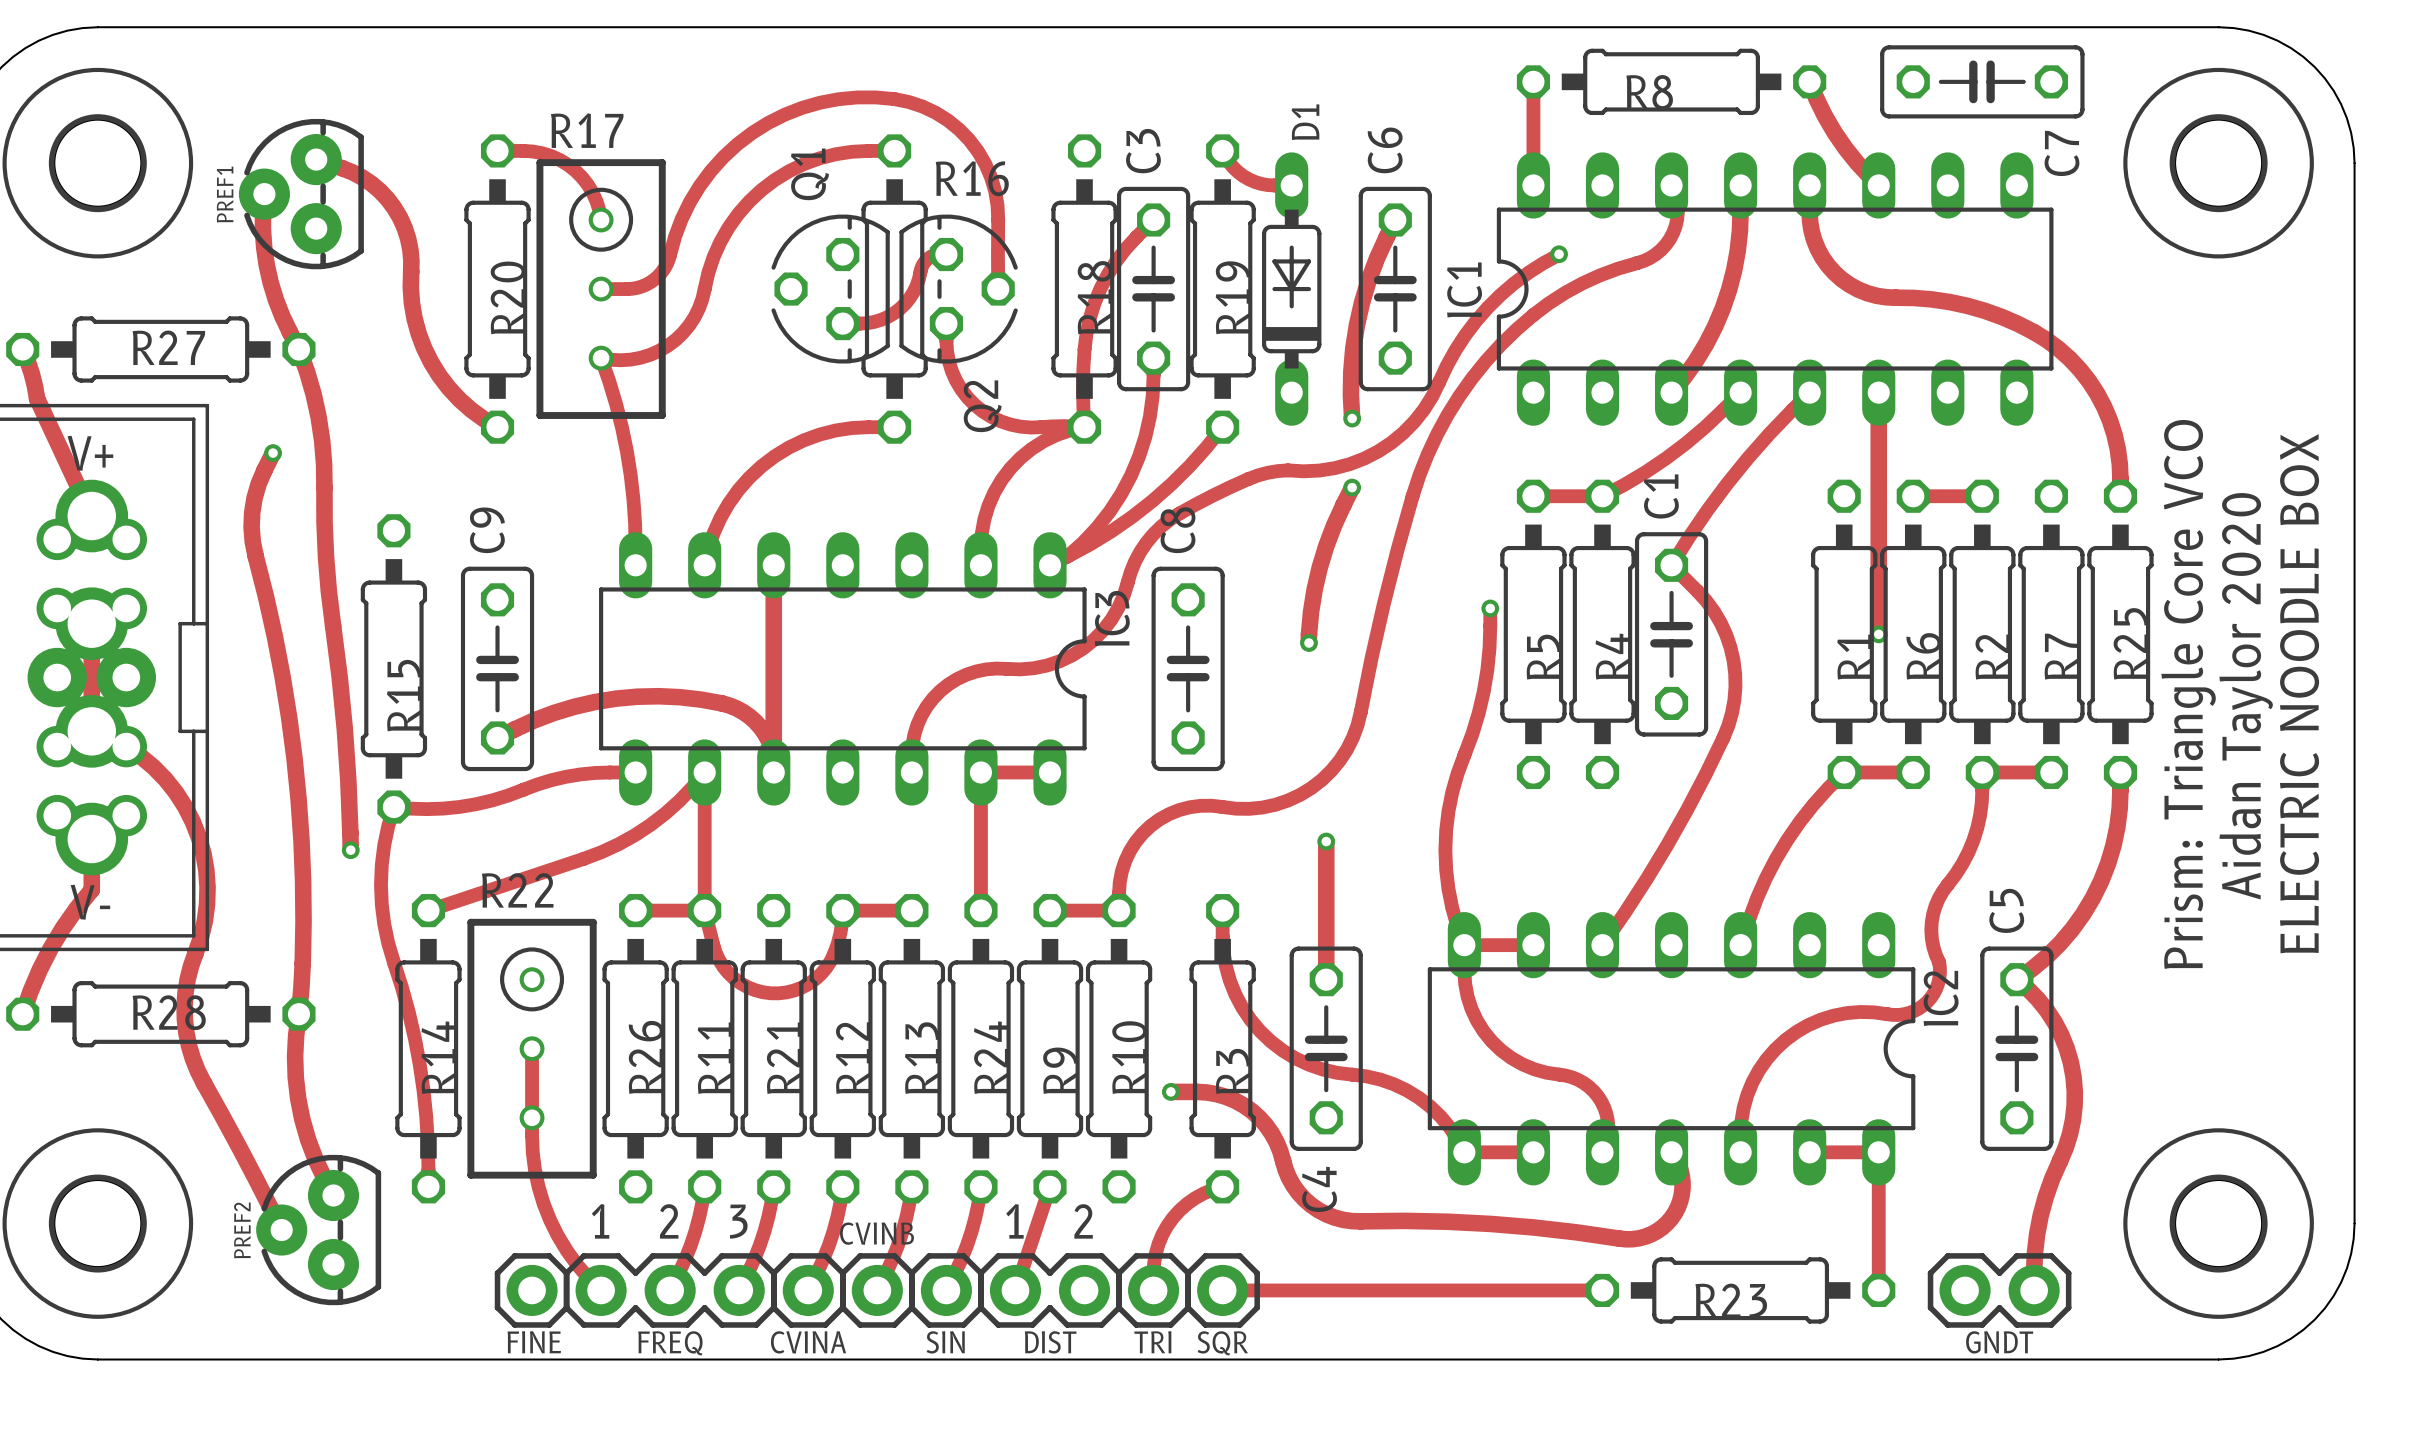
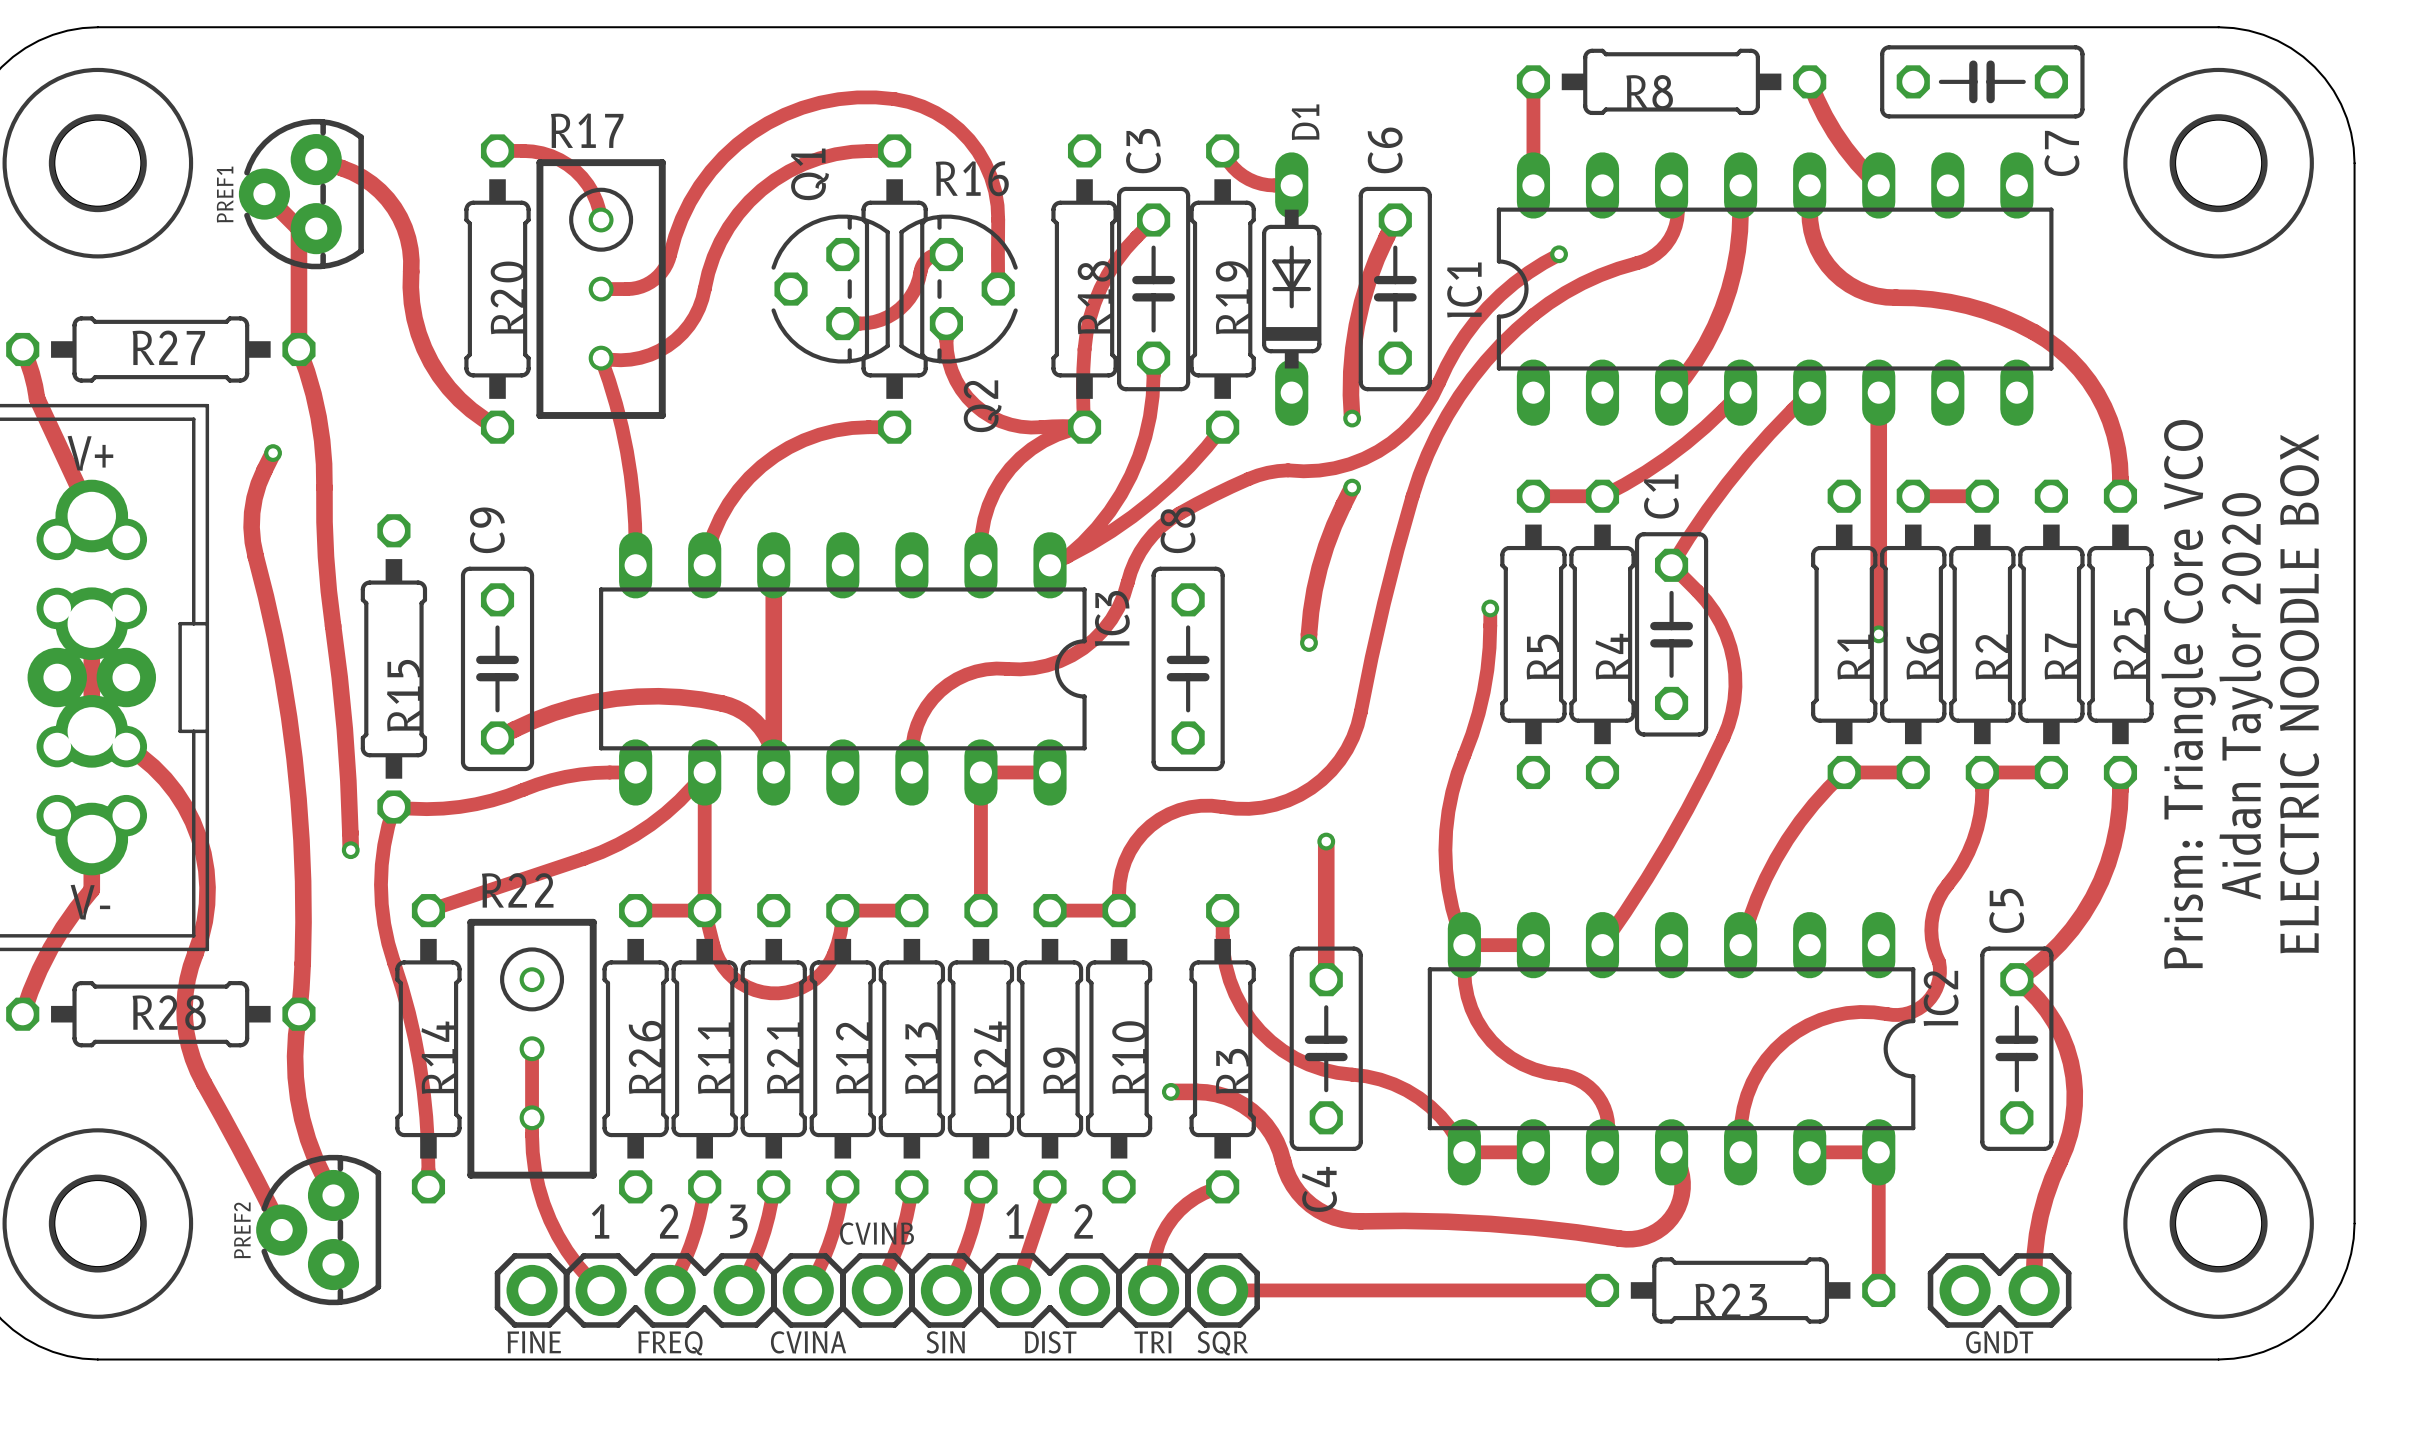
track: (264, 194) (262, 229) (266, 265) (275, 299) (298, 349) -> (264, 194) (298, 228) (298, 349)

